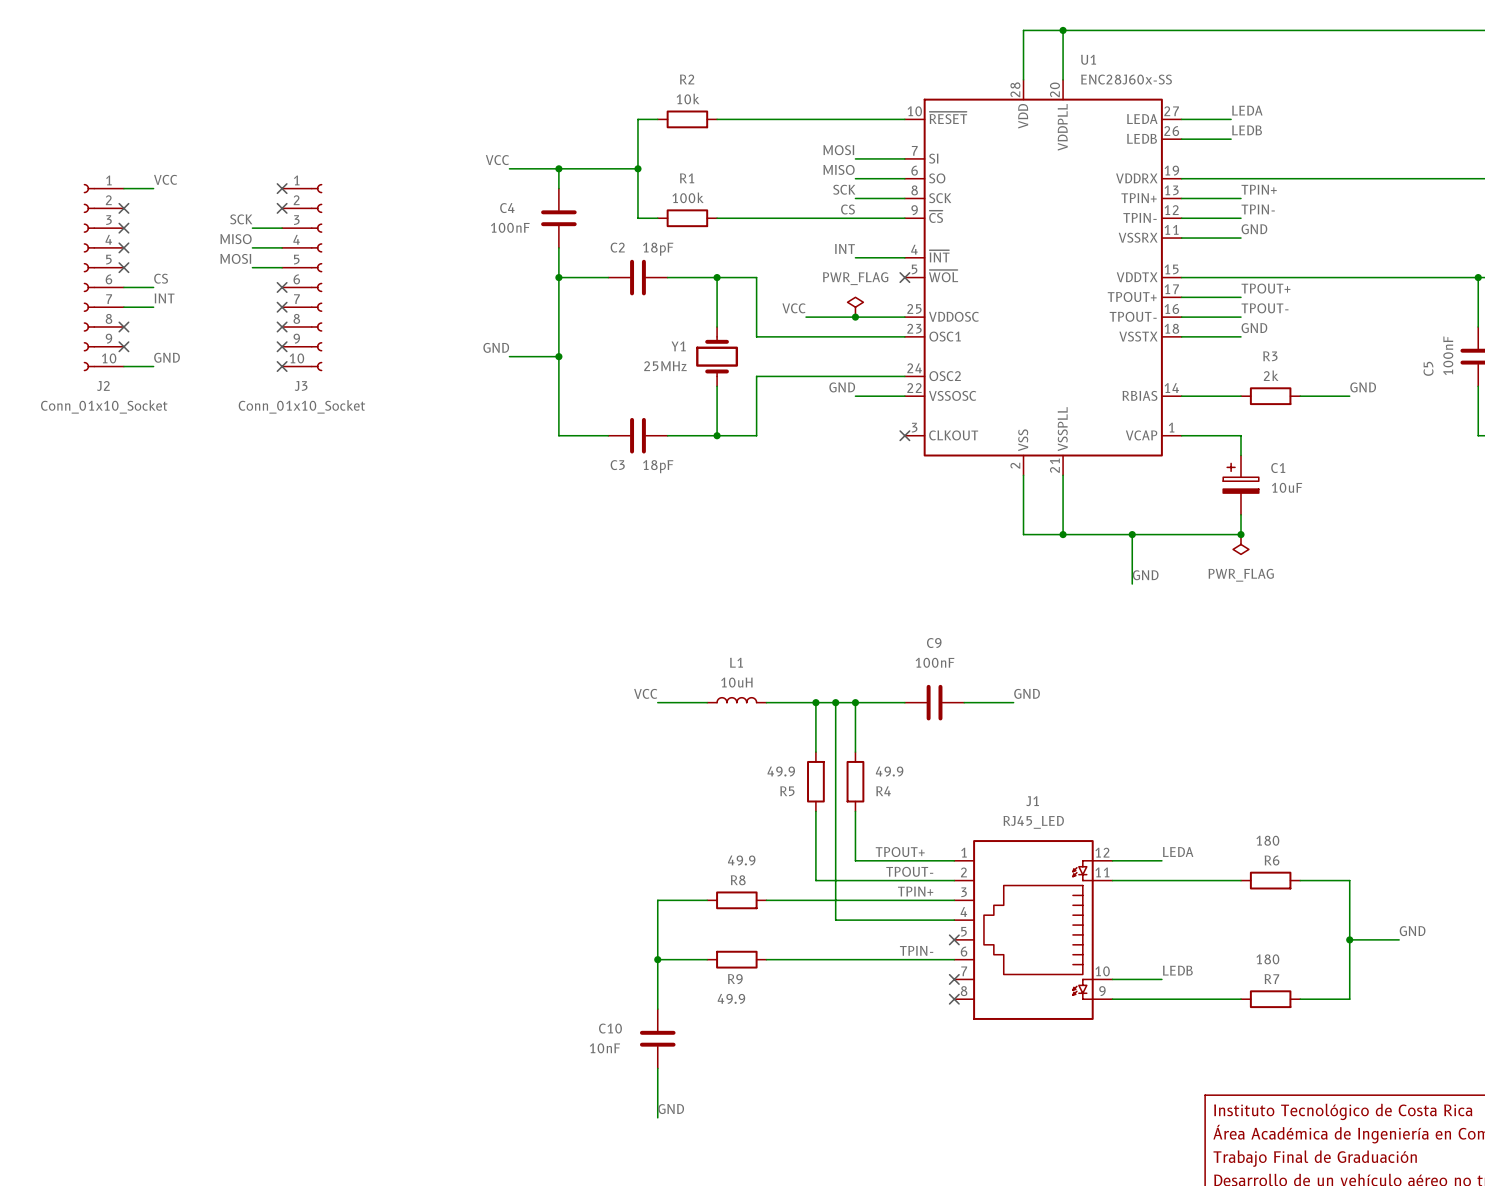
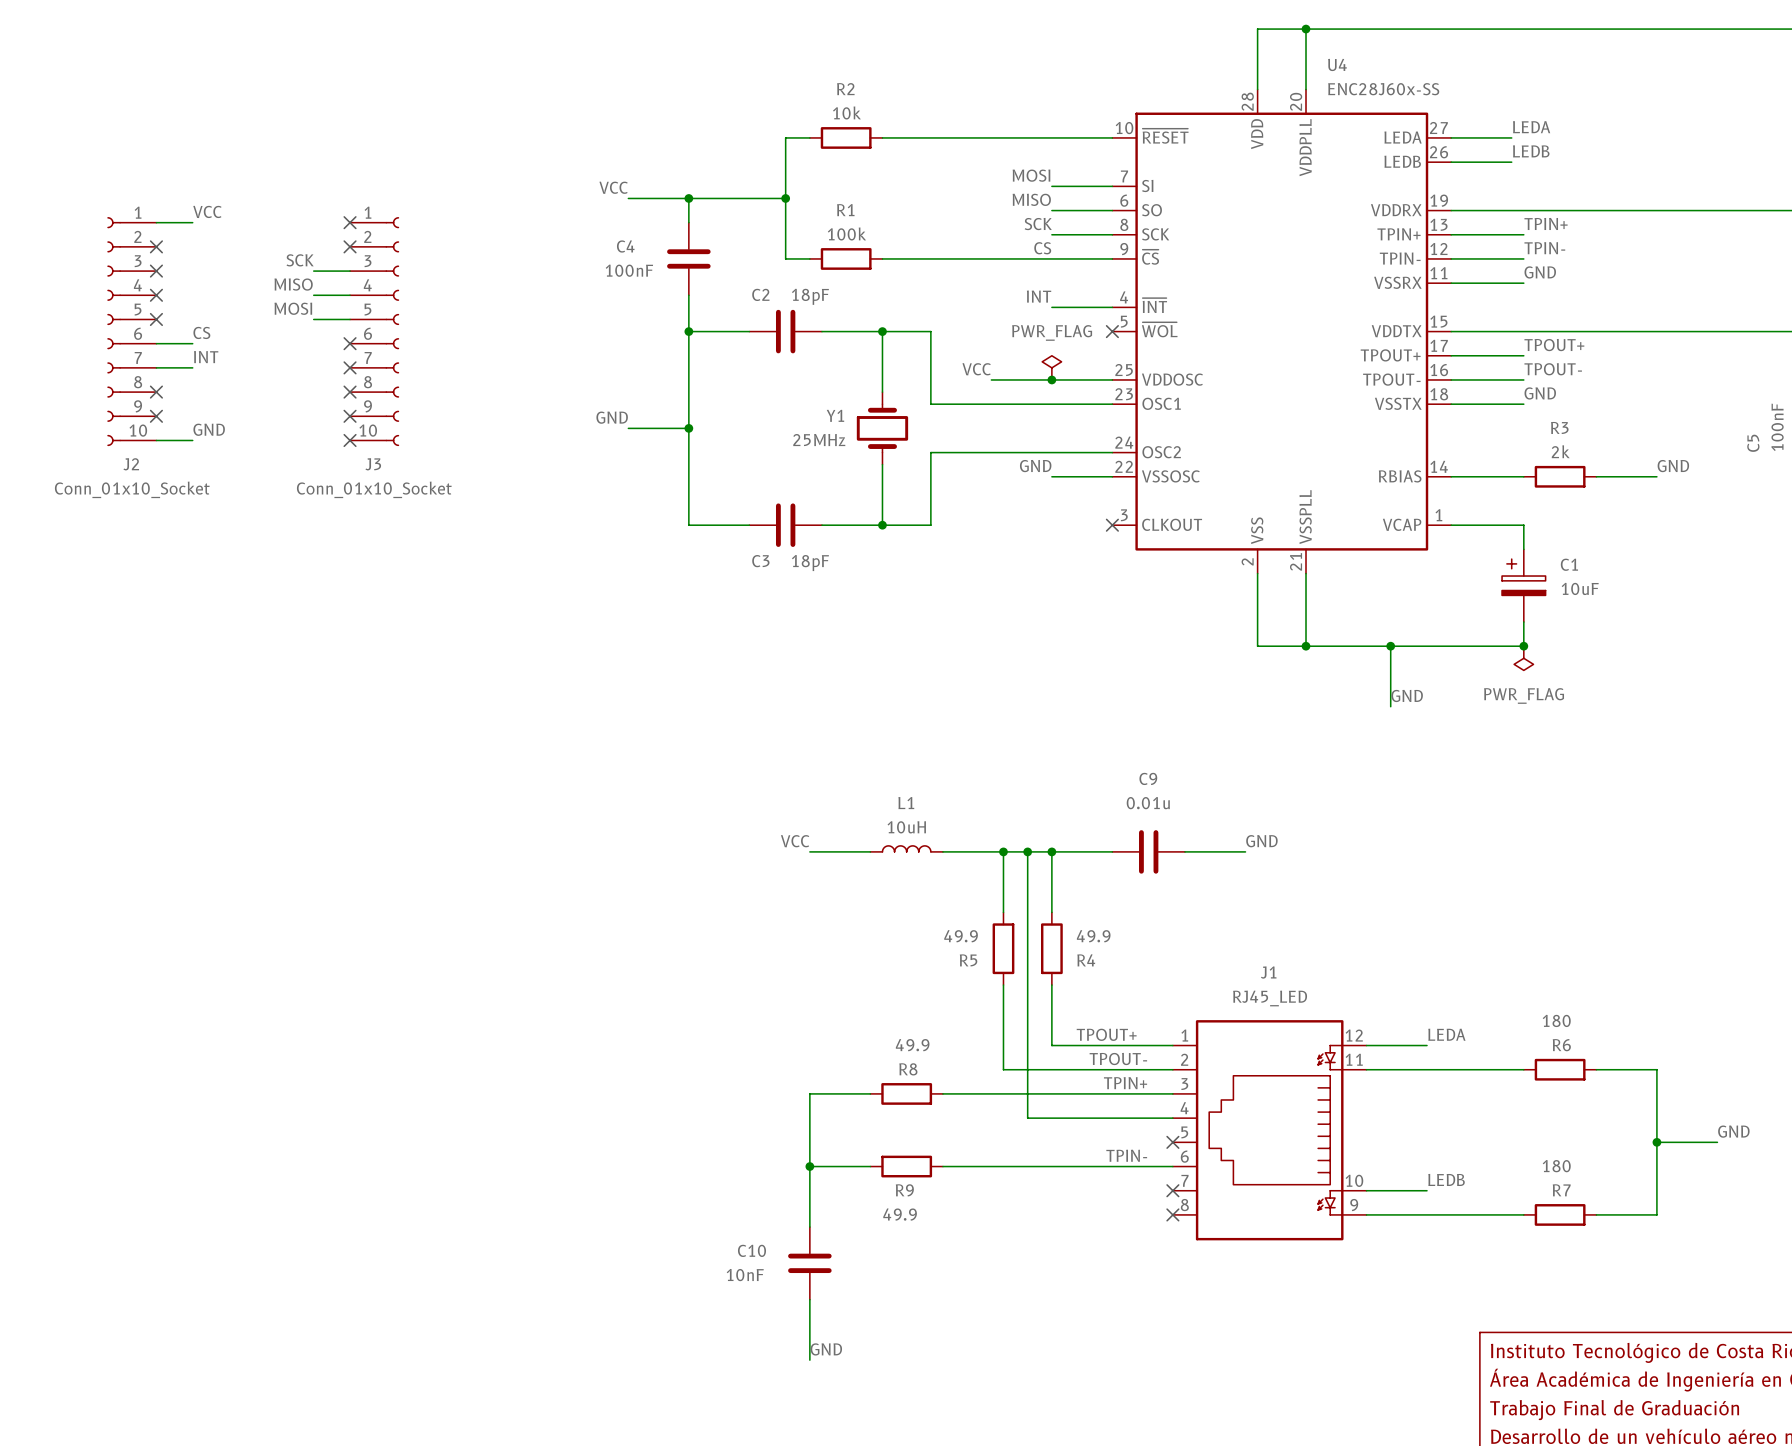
U1 name: U1 (1088, 59) -> U4 (1337, 64)
C9 value: 100nF (935, 662) -> 0.01u (1148, 803)

